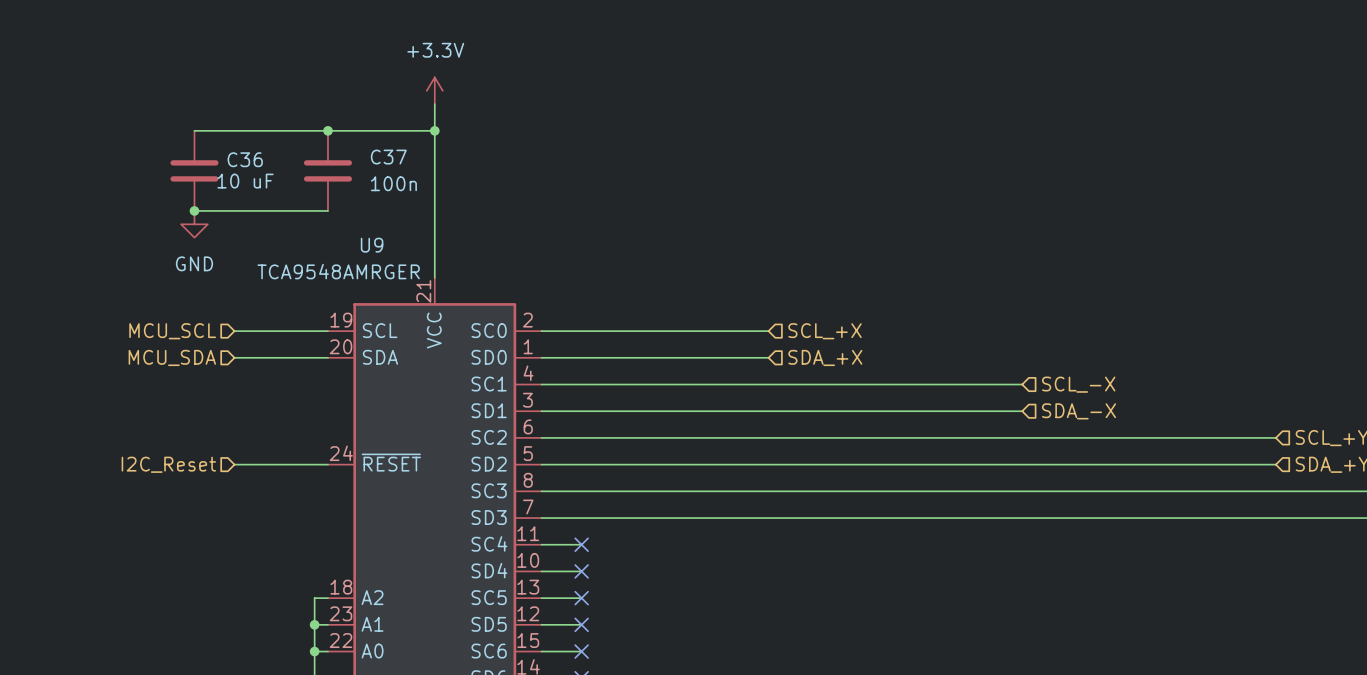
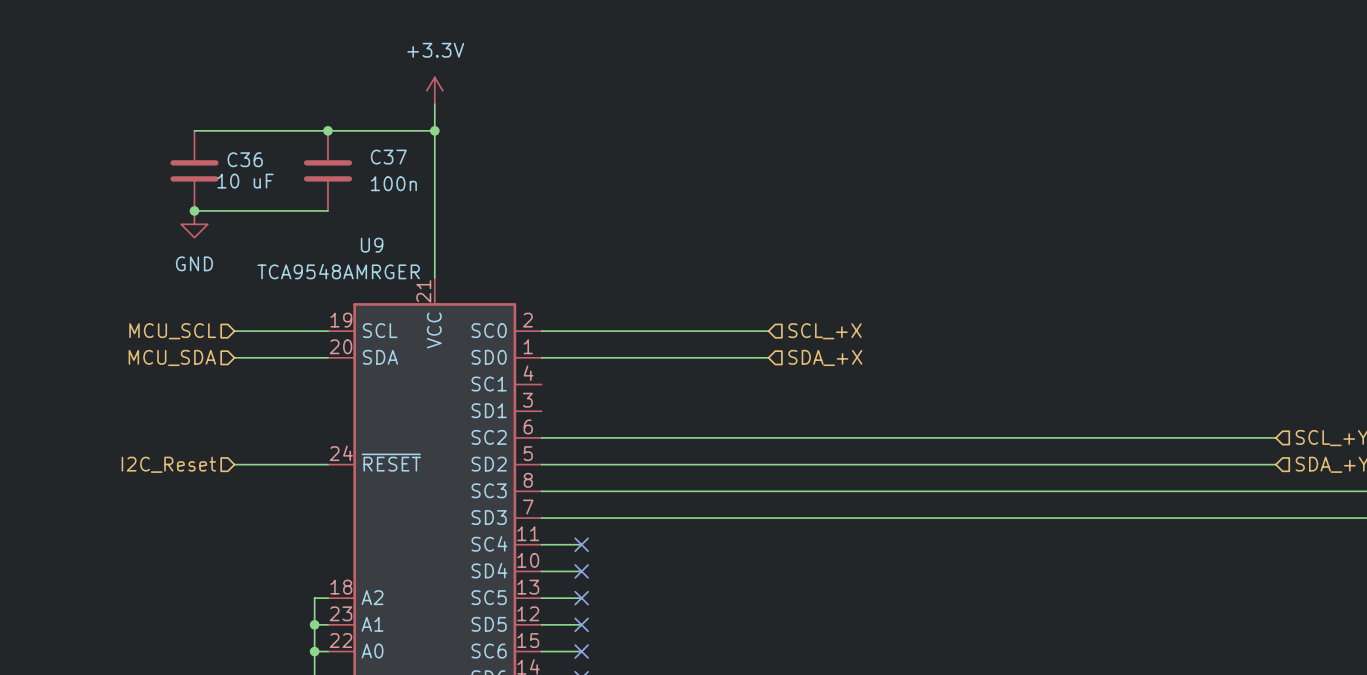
wire: (541, 384) (1022, 384) -> none
hierarchical label: SCL_-X (1078, 384) -> none
wire: (541, 411) (1022, 411) -> none
hierarchical label: SDA_-X (1079, 411) -> none

